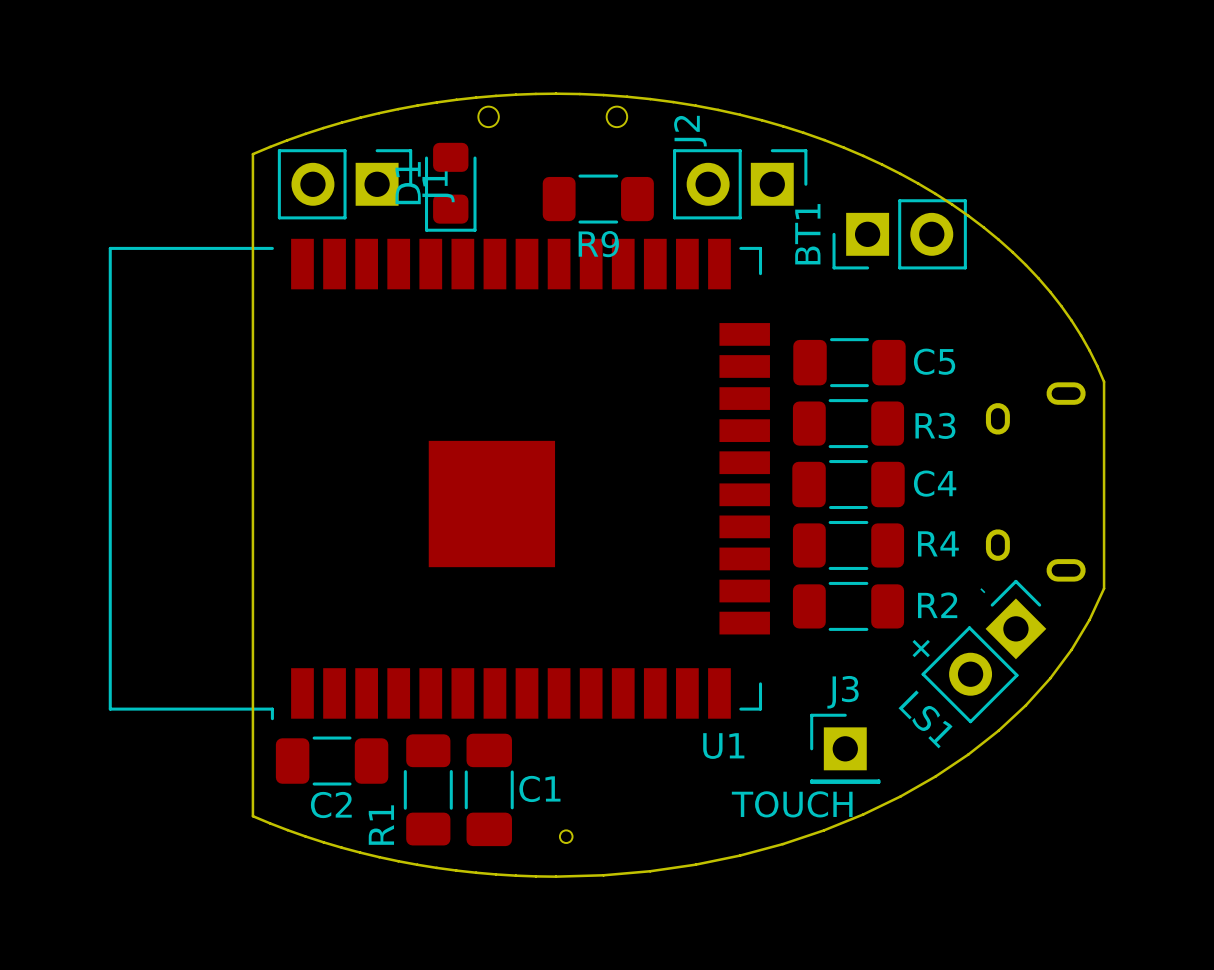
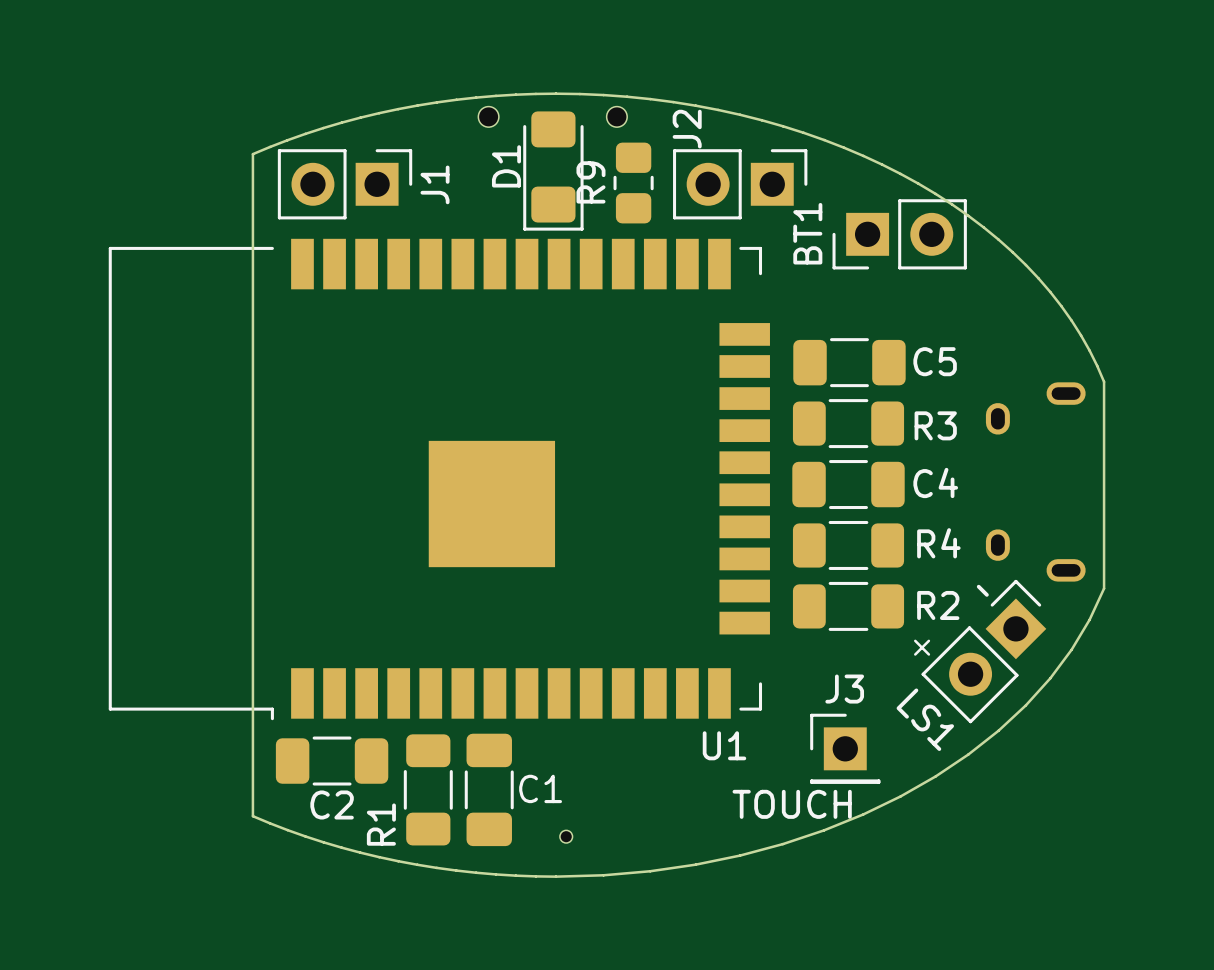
D1 footprint: [424, 142, 477, 232] -> [523, 111, 584, 231]
R9 footprint: [542, 174, 654, 224] -> [613, 142, 654, 224]
R9 name position: R9 (598, 244) -> R9 (590, 182)

